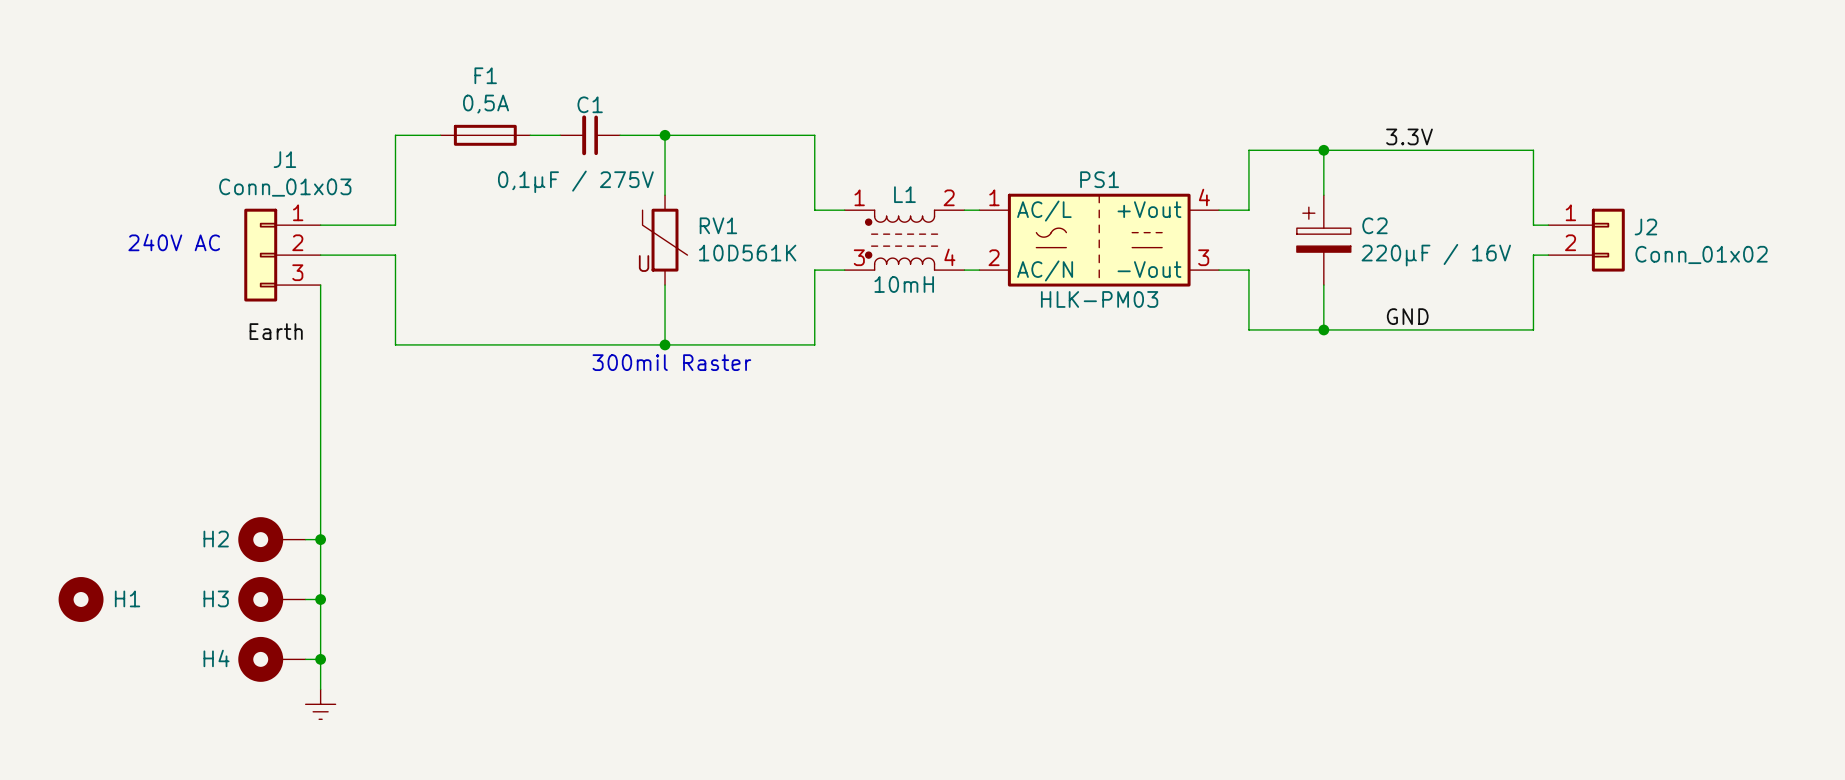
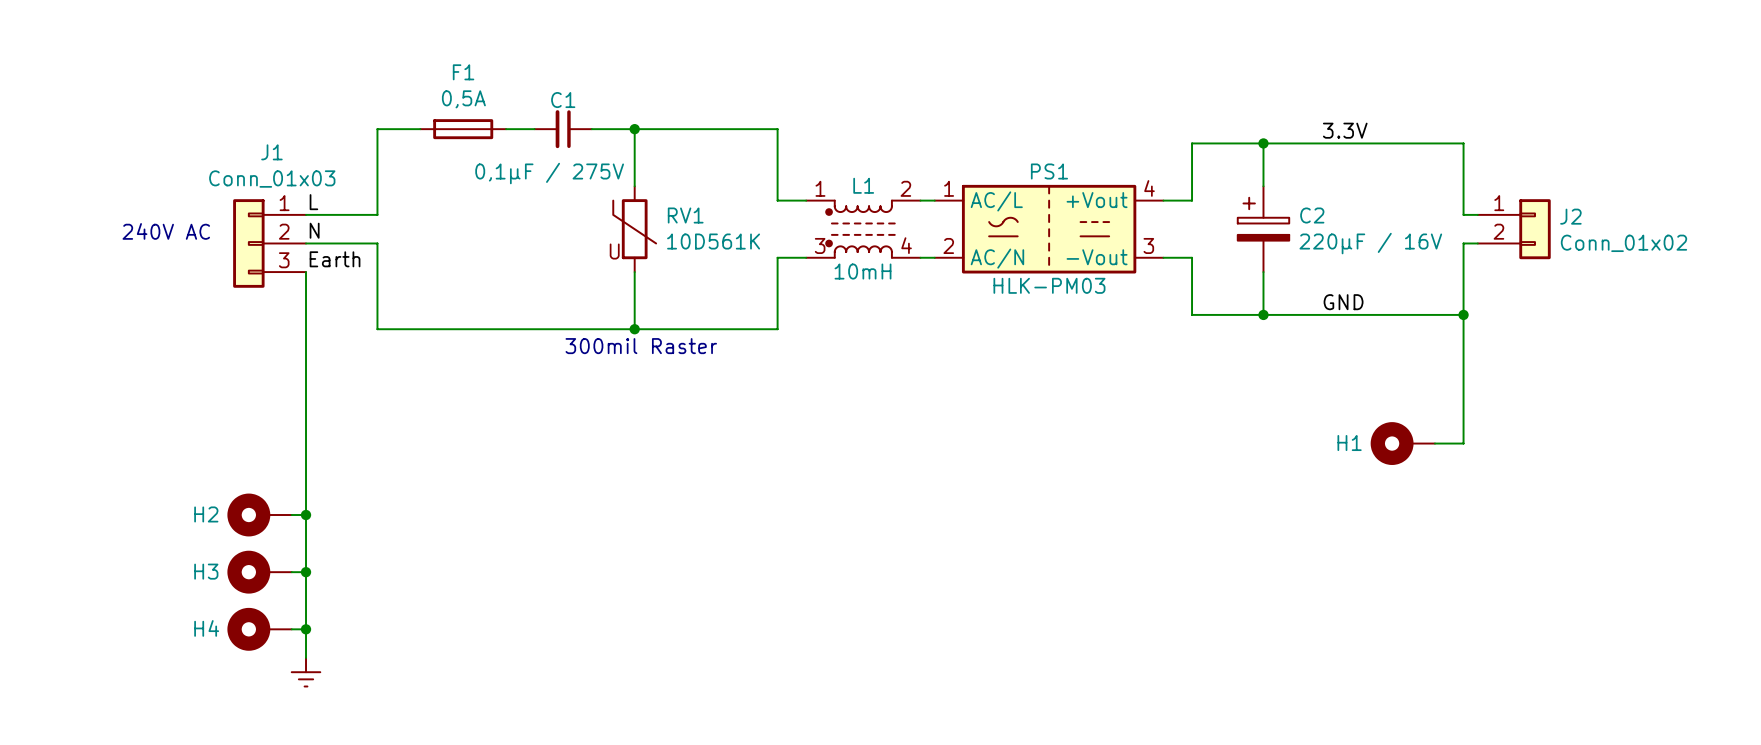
label: none -> L (313, 202)
label: none -> N (314, 230)
wire: none -> (1463, 314) (1463, 443) (1434, 443)
junction: none -> (1463, 314)
label position: Earth (276, 331) -> Earth (335, 259)
H1 symbol: [58, 577, 104, 622] -> [1370, 422, 1435, 465]
H1 name position: H1 (127, 598) -> H1 (1349, 443)

